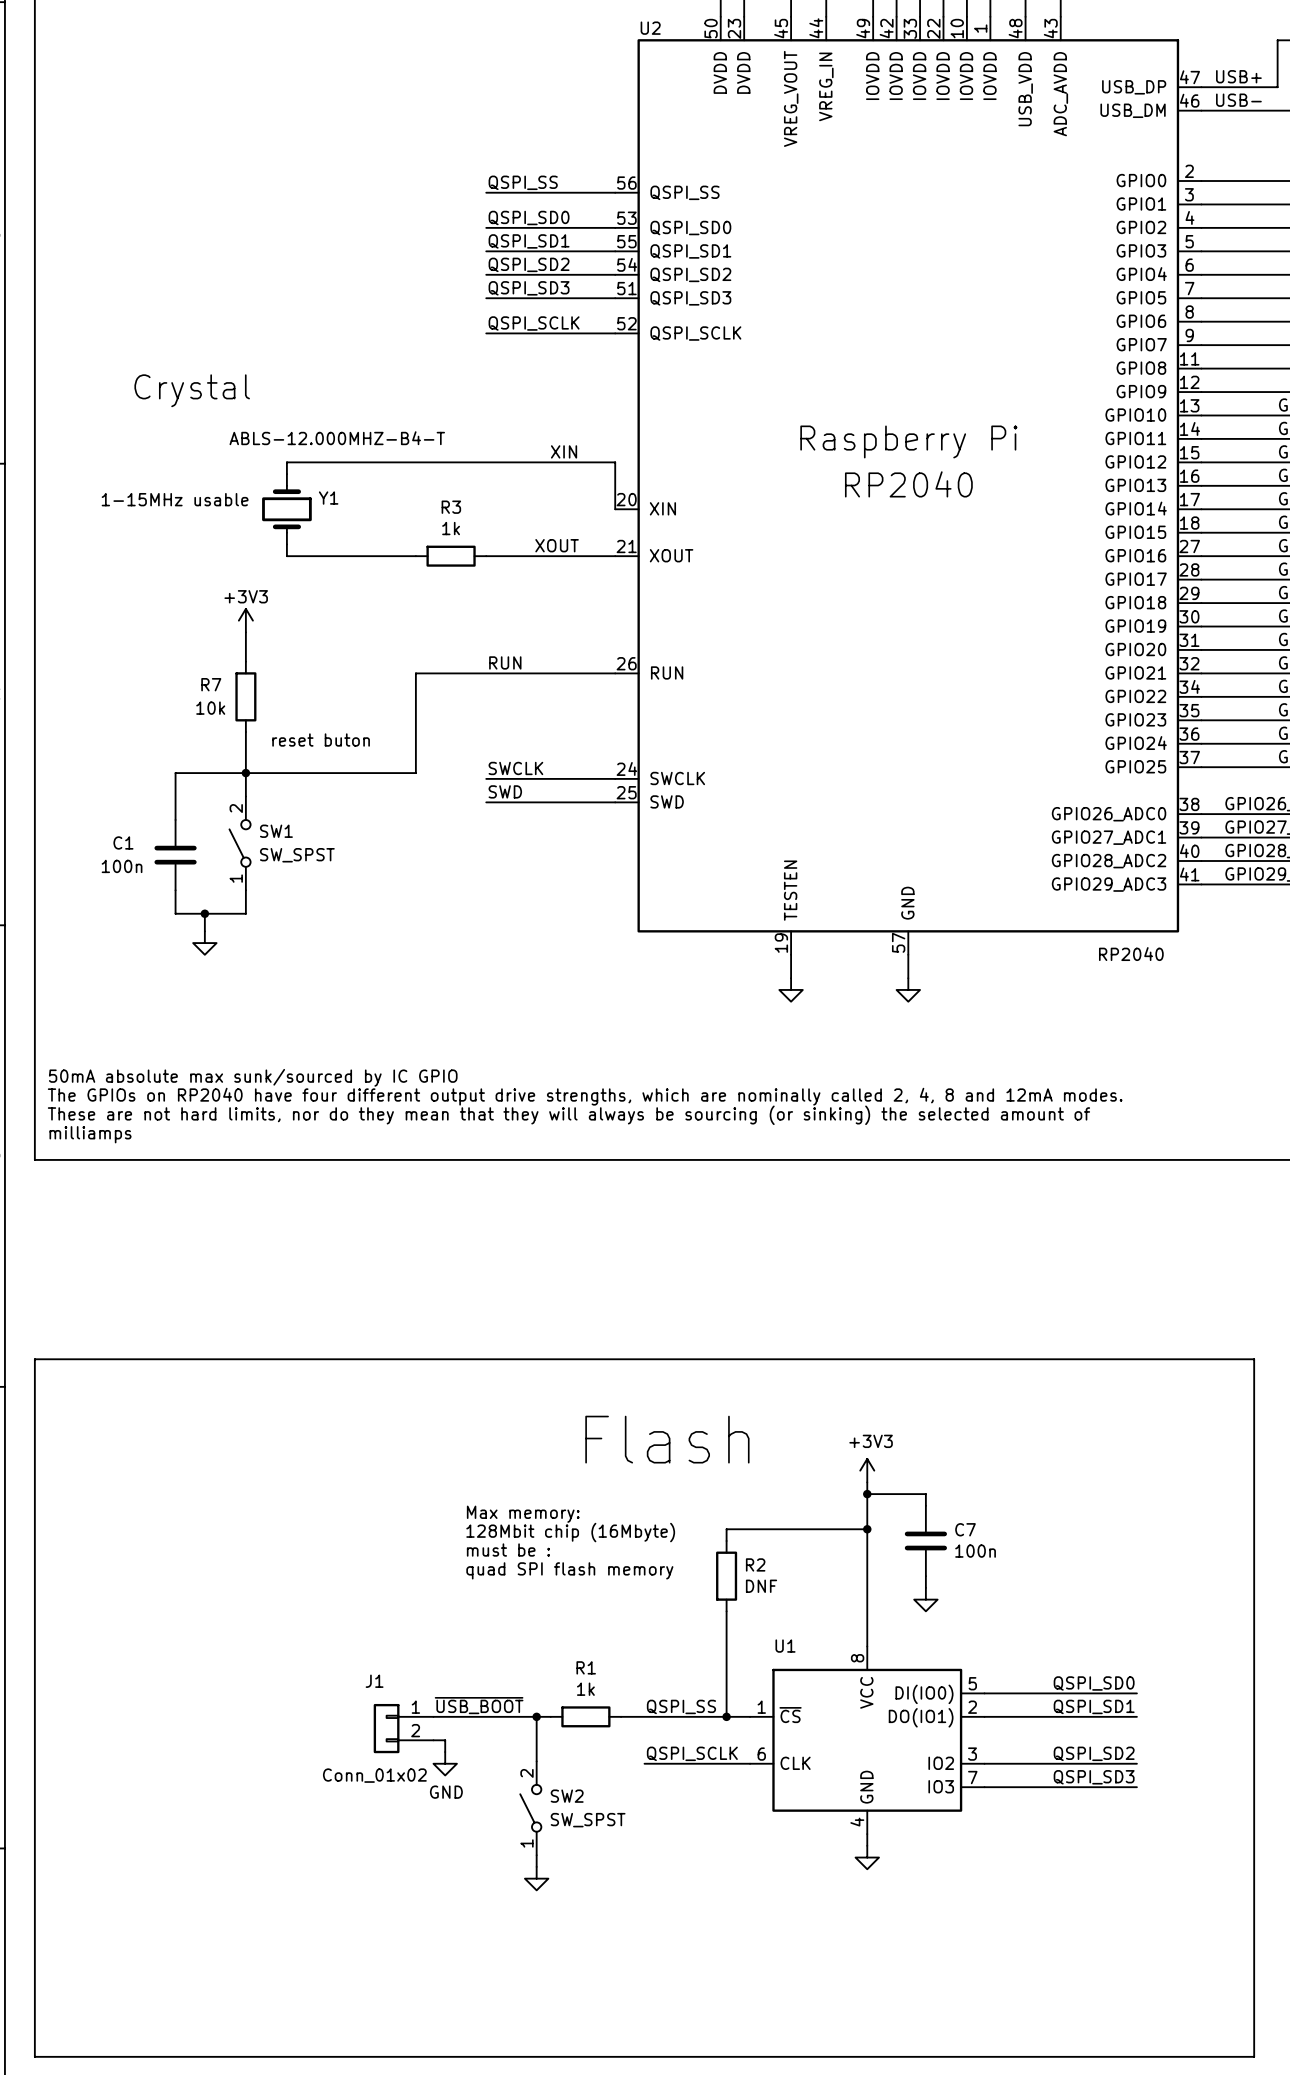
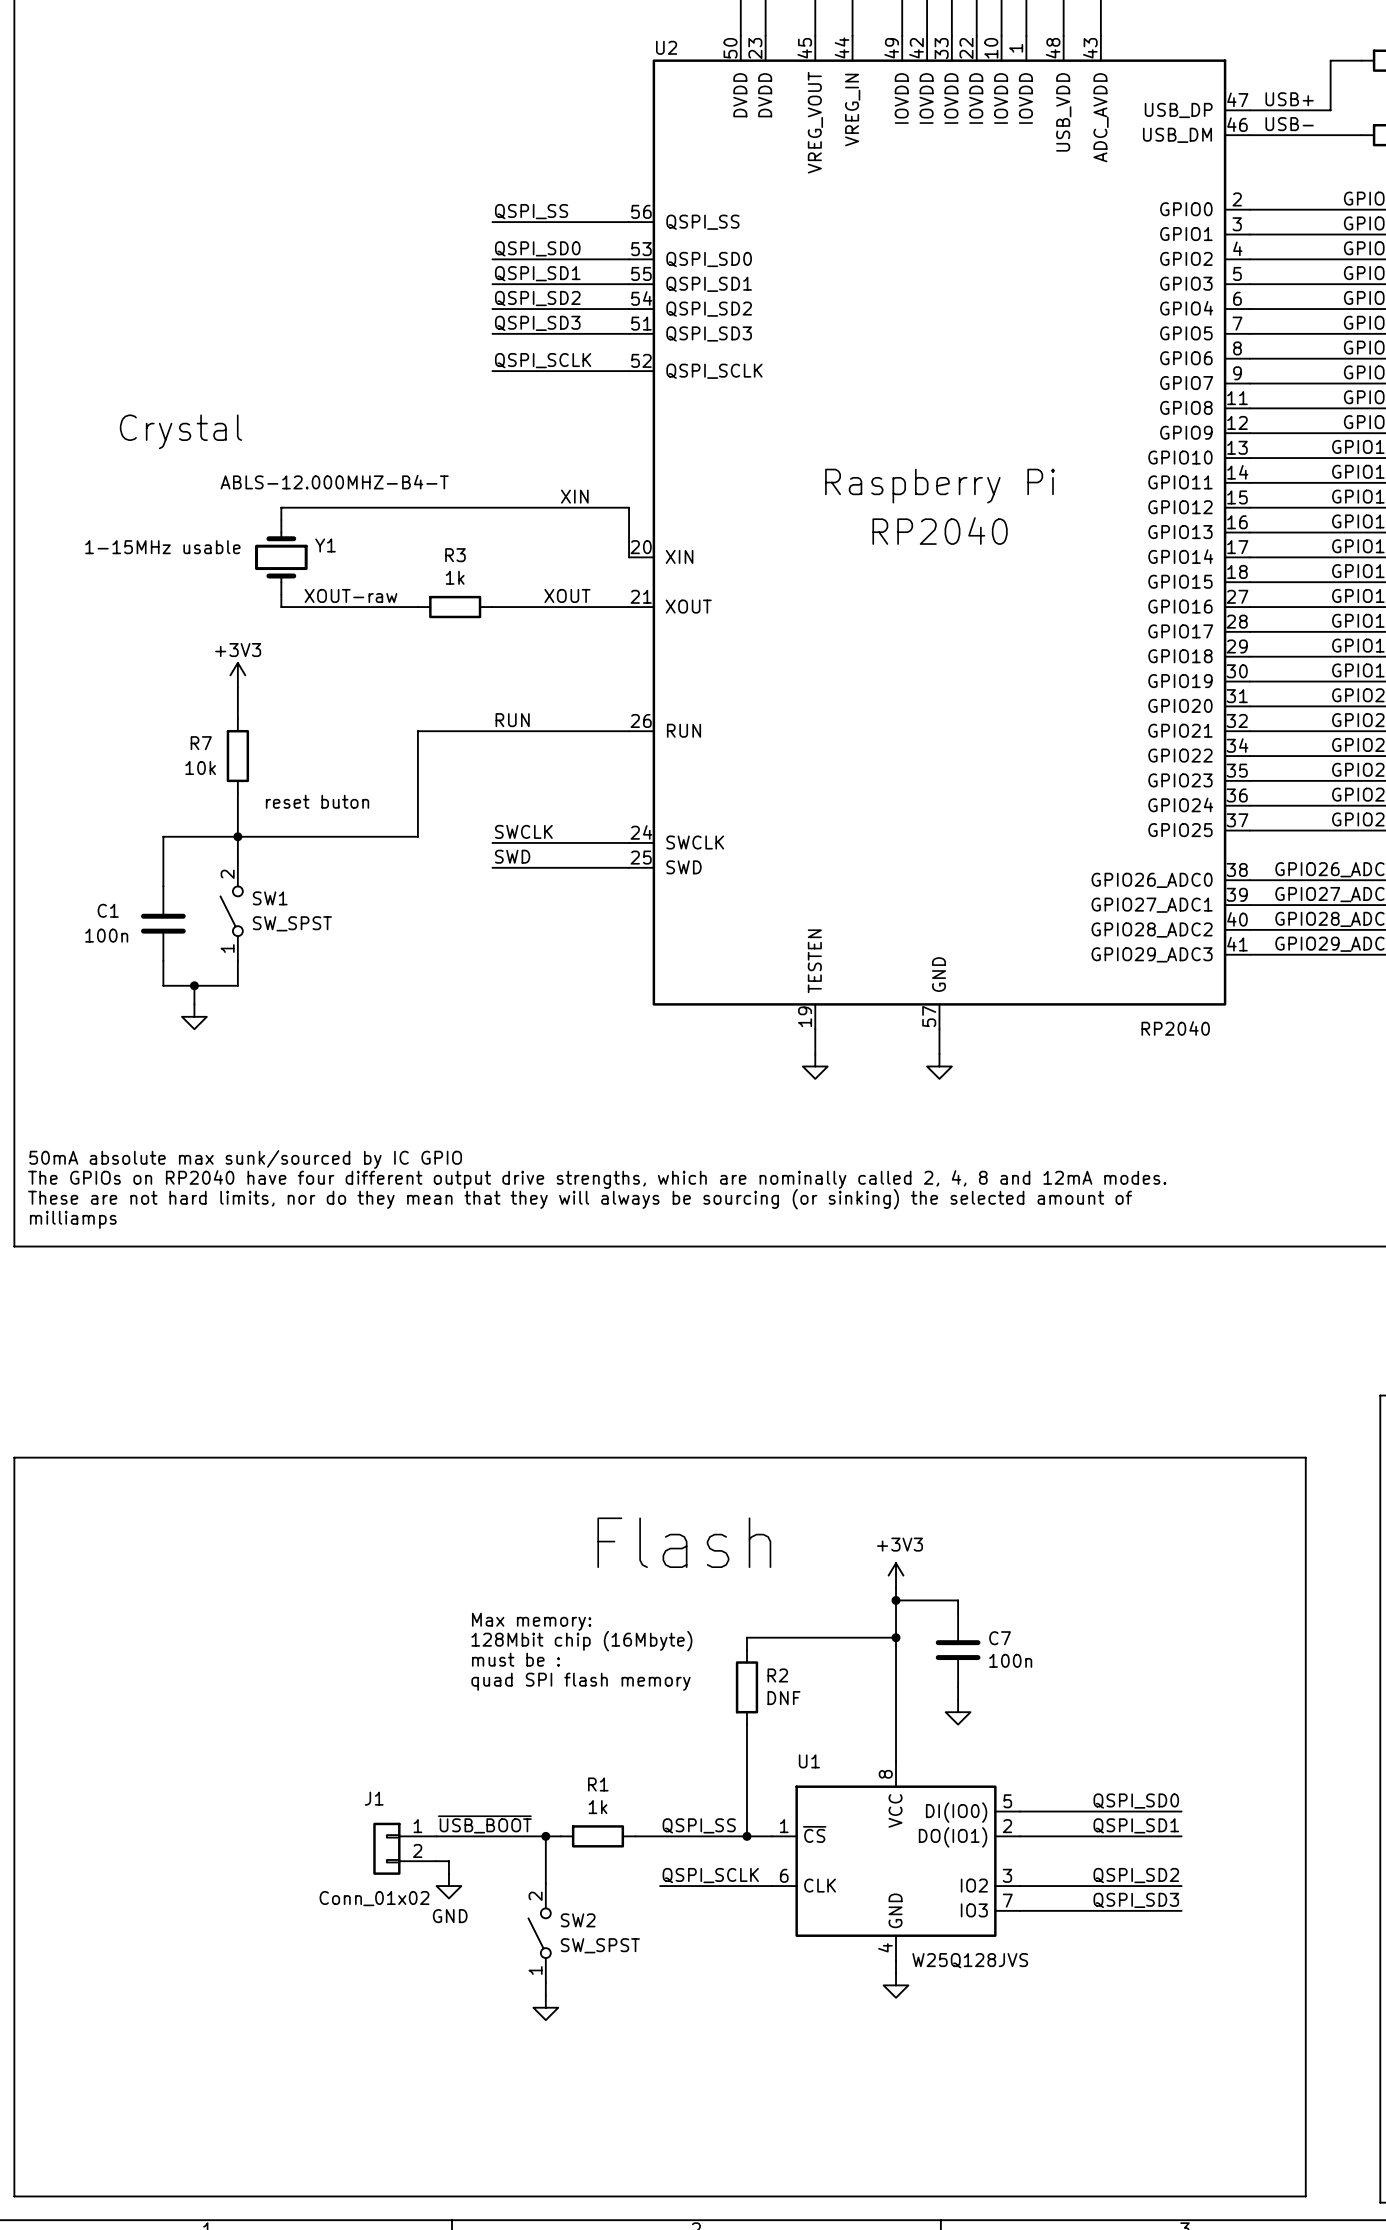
label: none -> XOUT-raw (351, 595)
U1 value: none -> W25Q128JVS (970, 1960)

